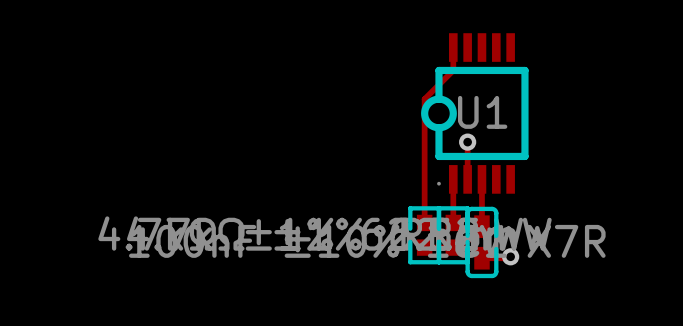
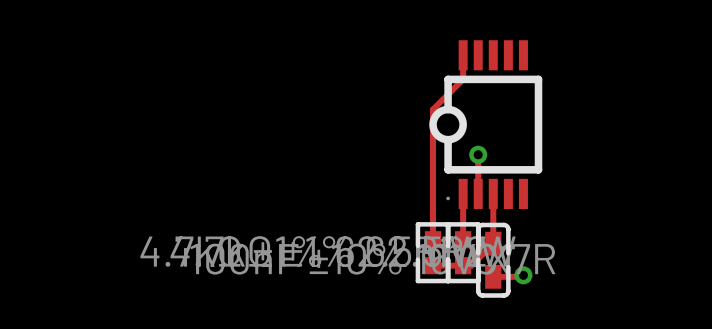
U1 name: U1 (482, 112) -> none

